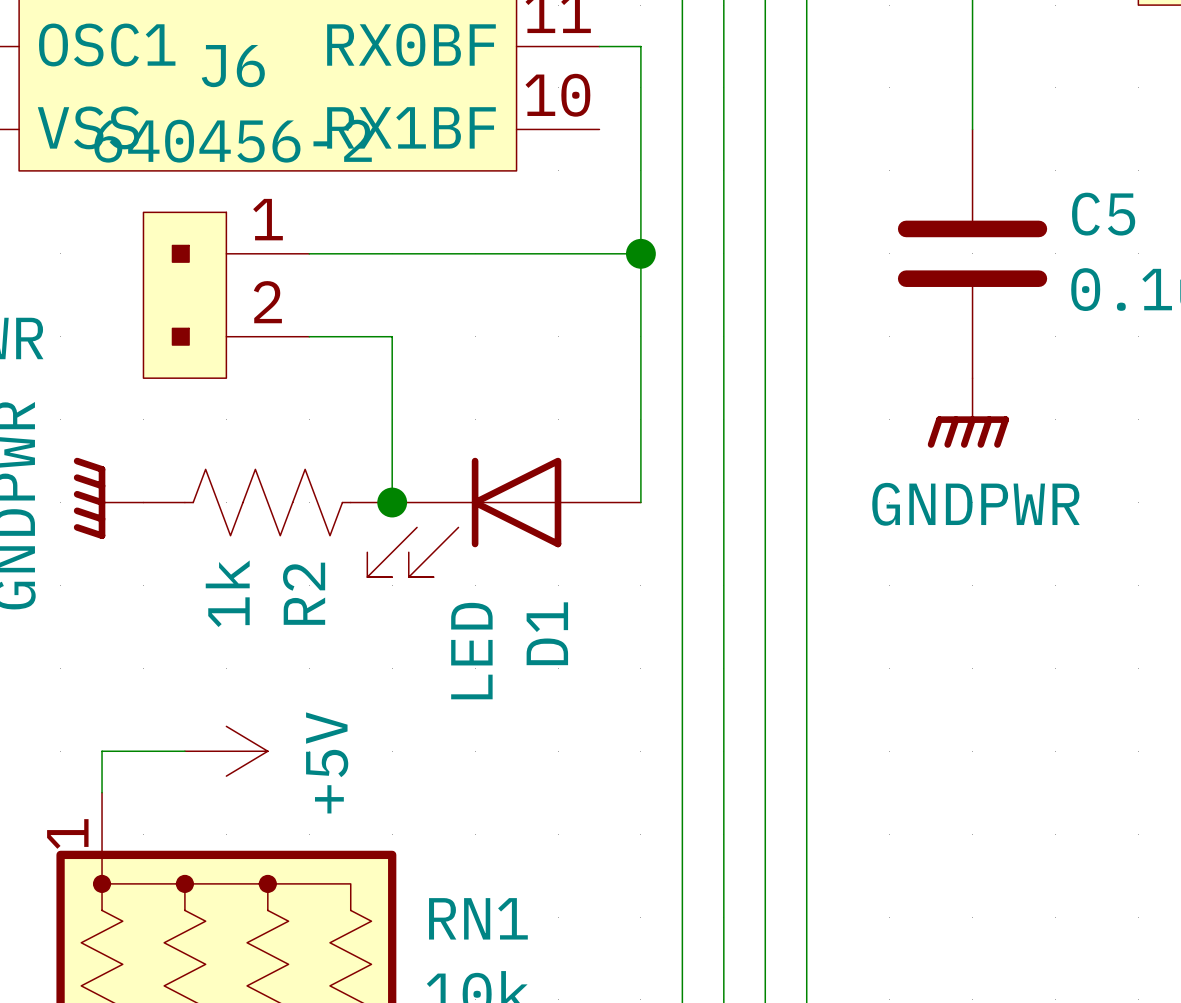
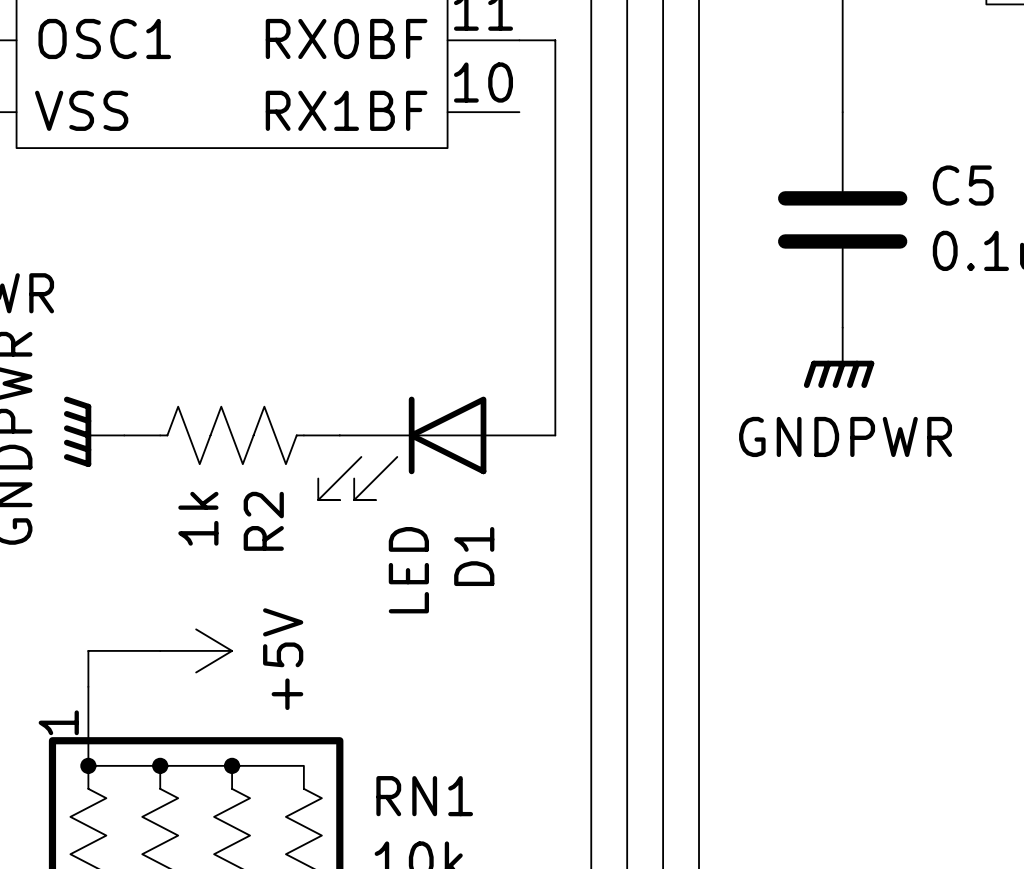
wire: (309, 253) (640, 253) -> none
junction: (640, 253) -> none
J6: 640456-2 (226, 295) -> none
wire: (309, 336) (392, 336) (392, 502) -> none
junction: (392, 502) -> none

